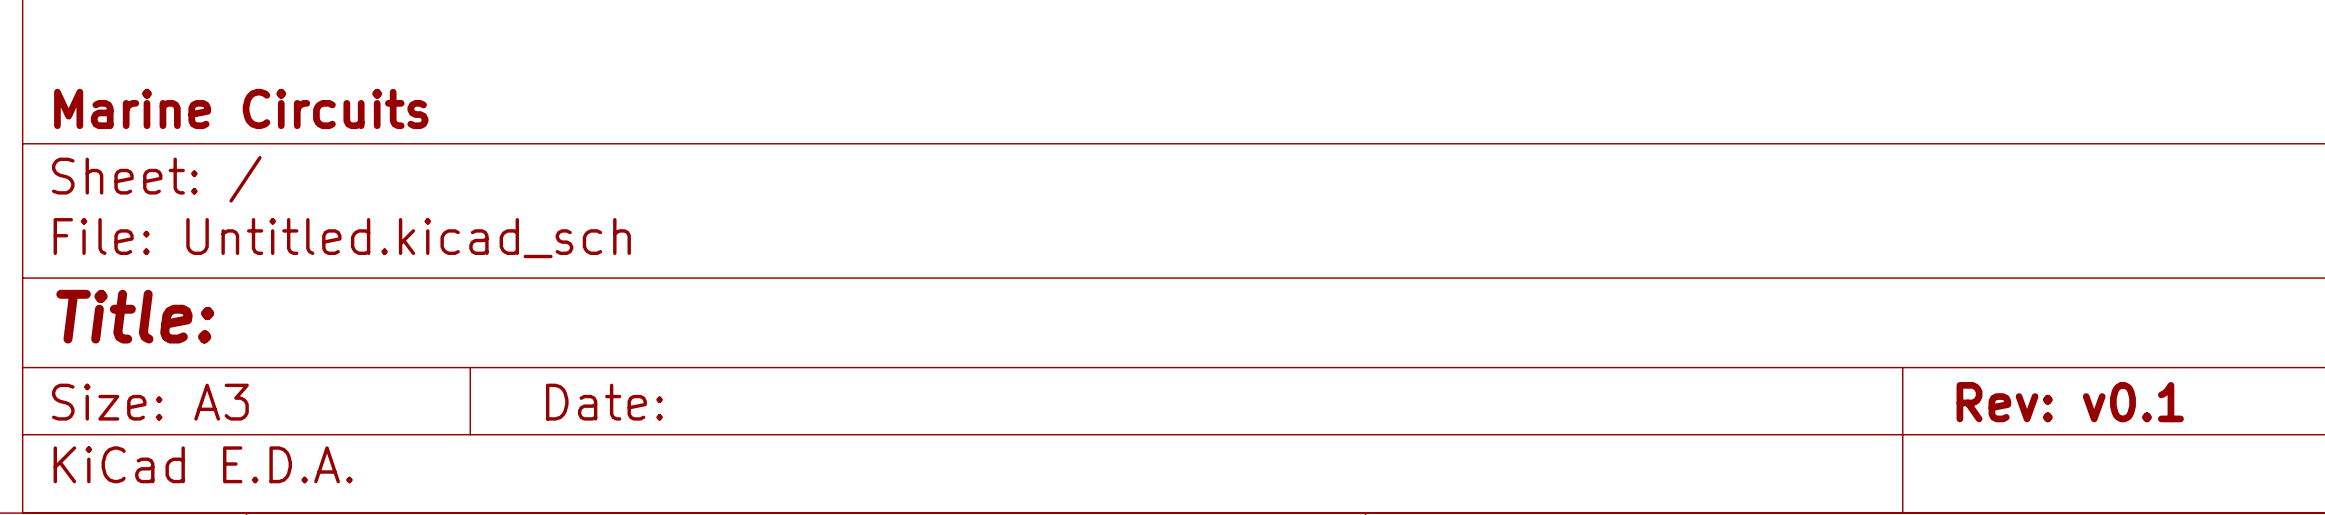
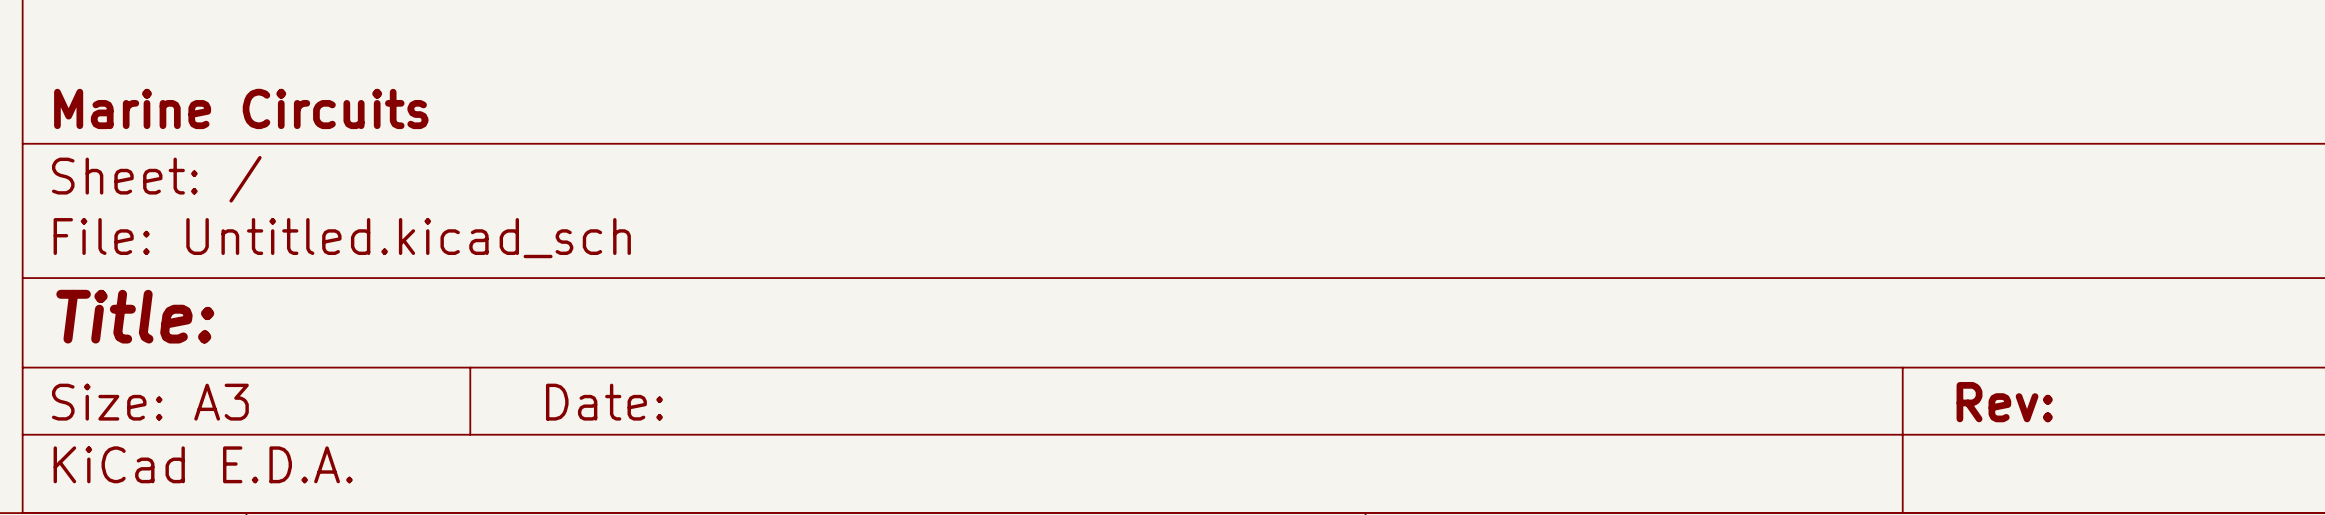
title block: Rev: v0.1 (2070, 402) -> Rev: (2004, 402)

